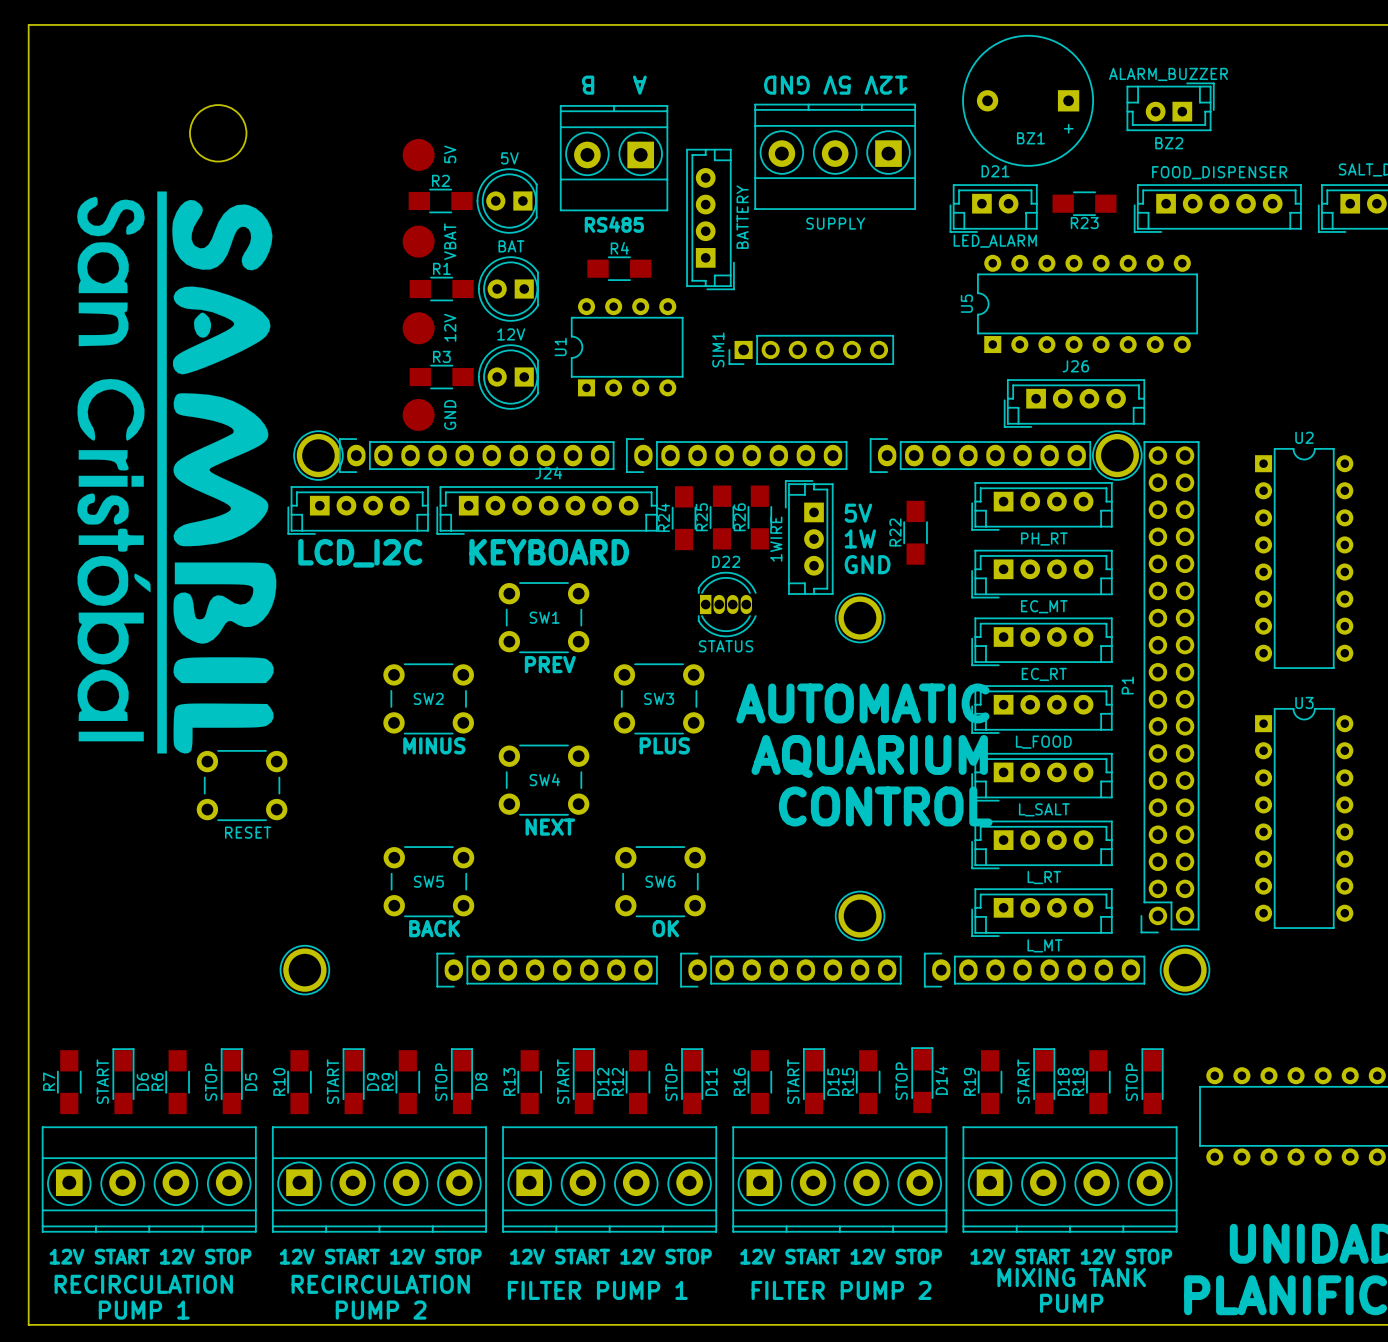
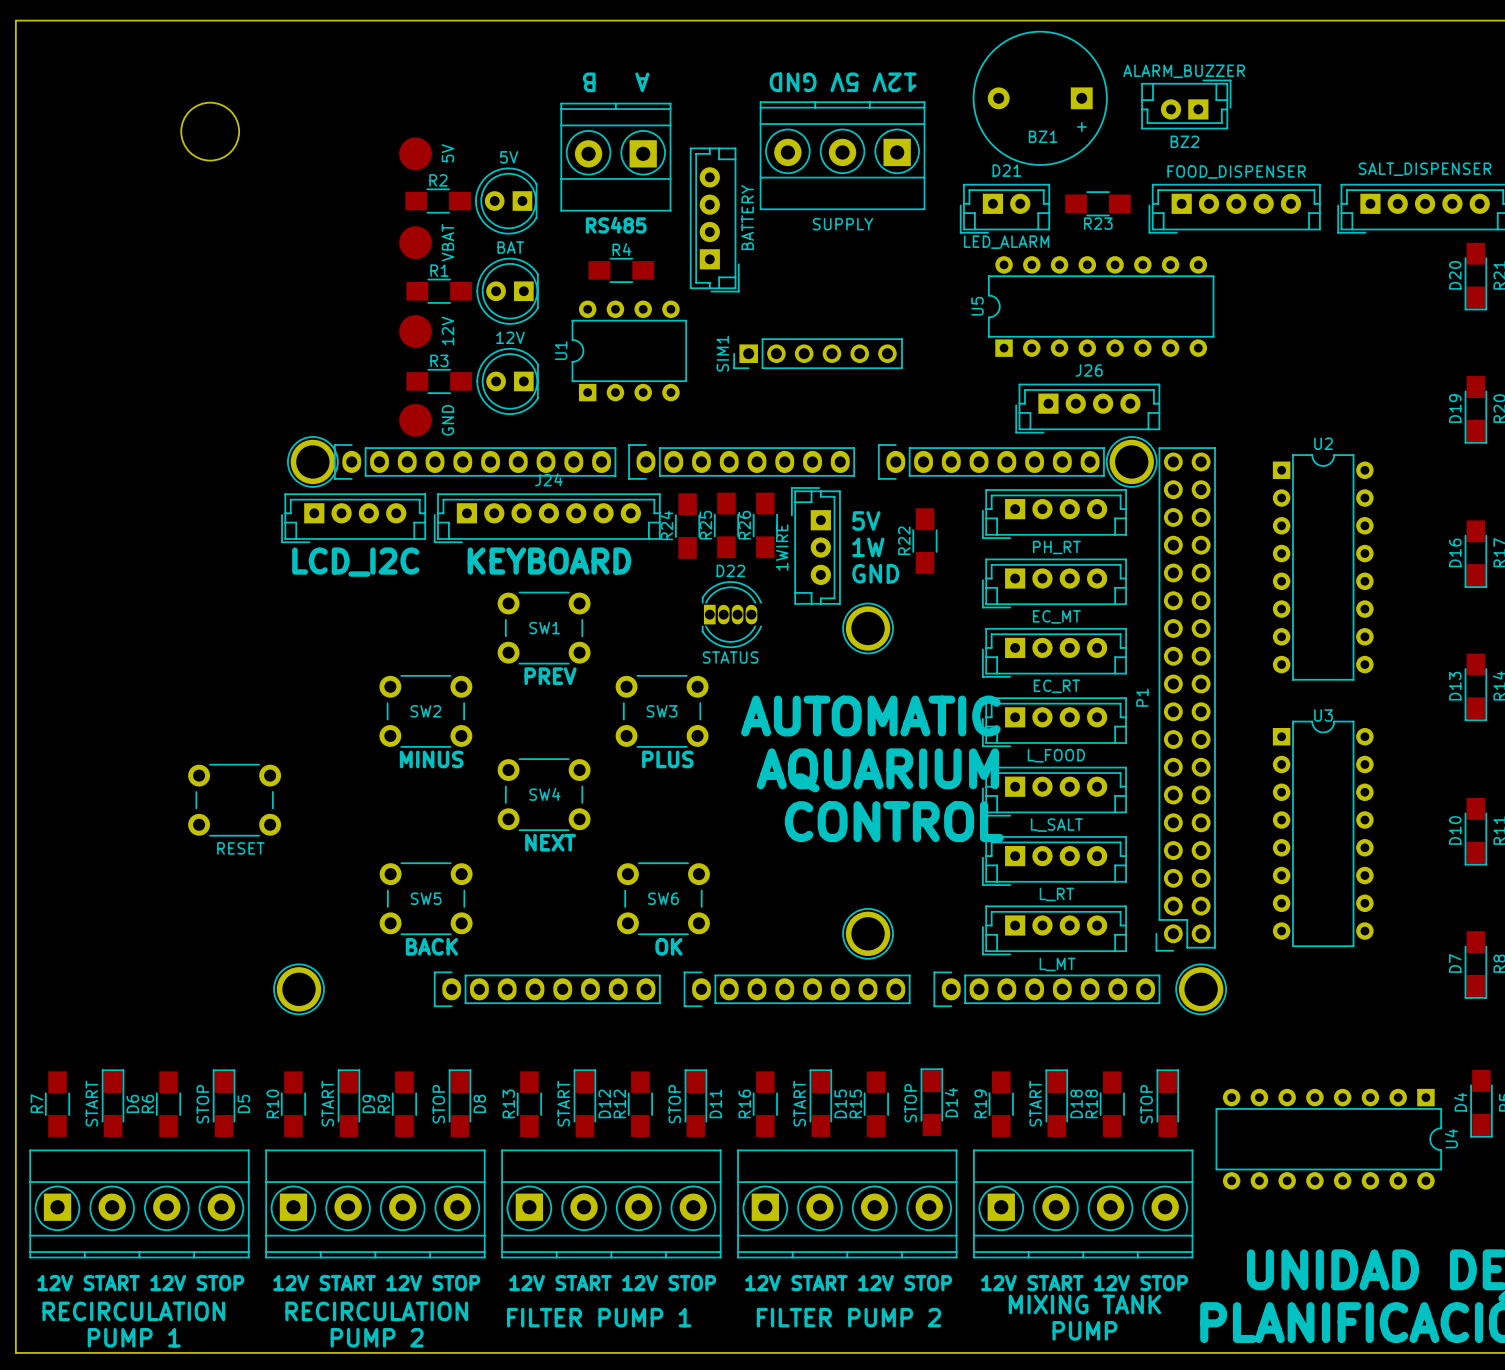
drawing: [77, 191, 277, 754] -> none

